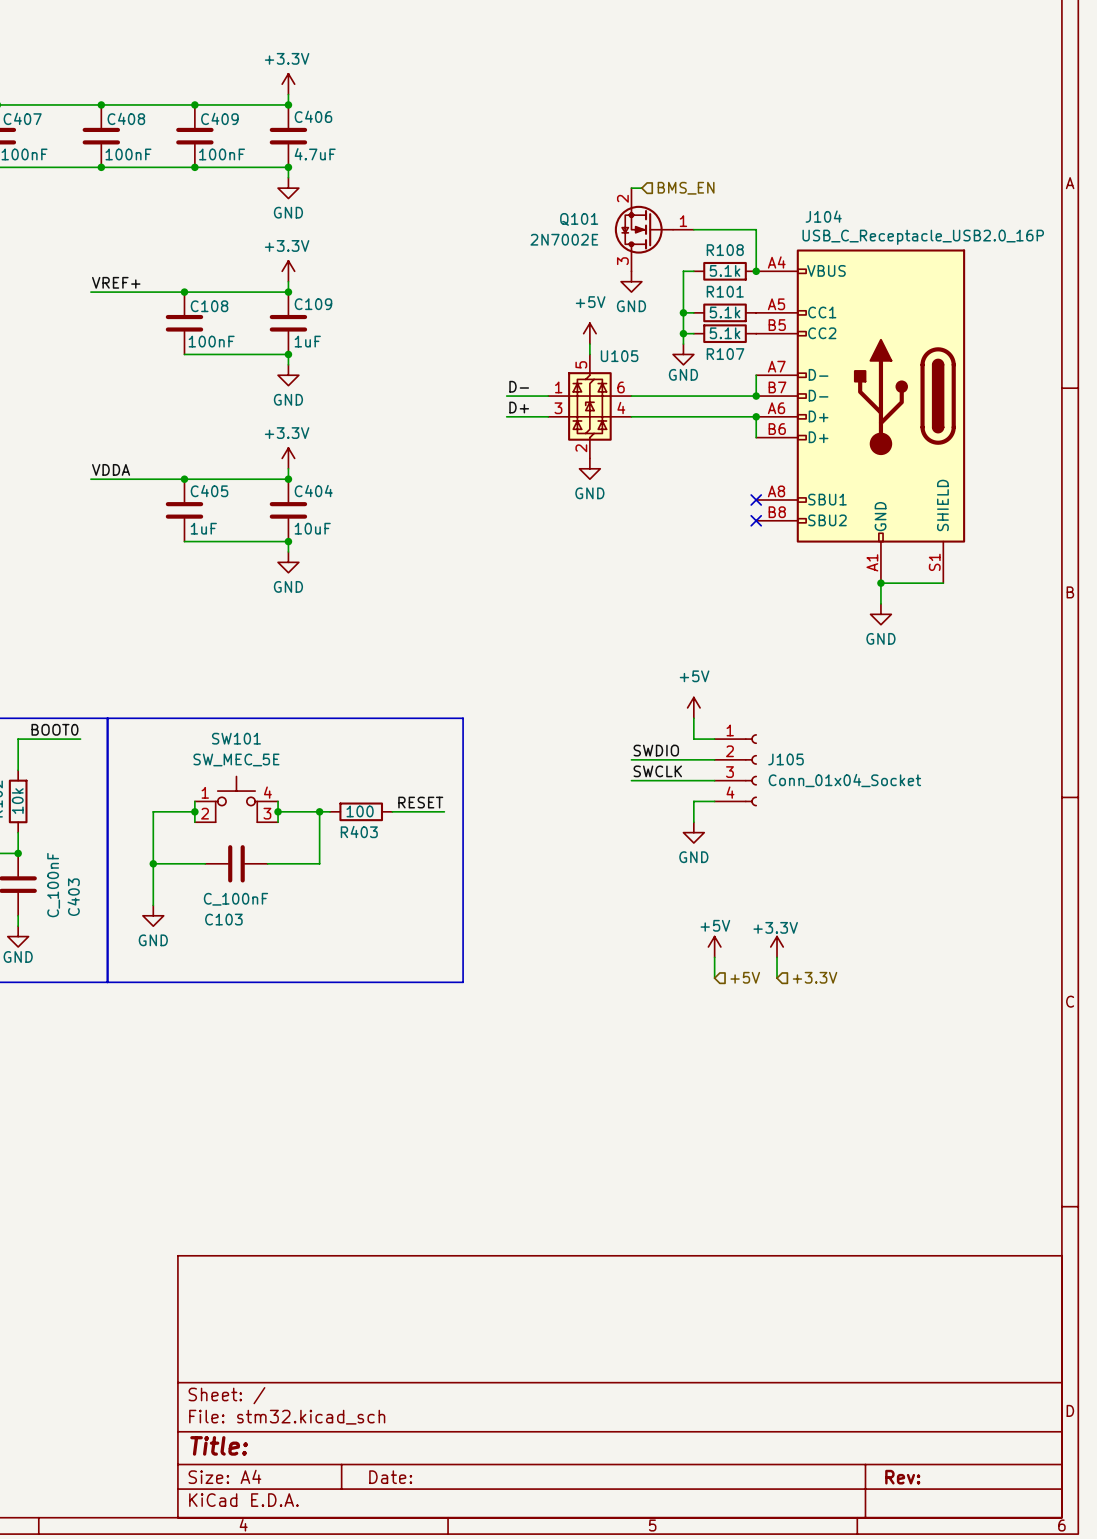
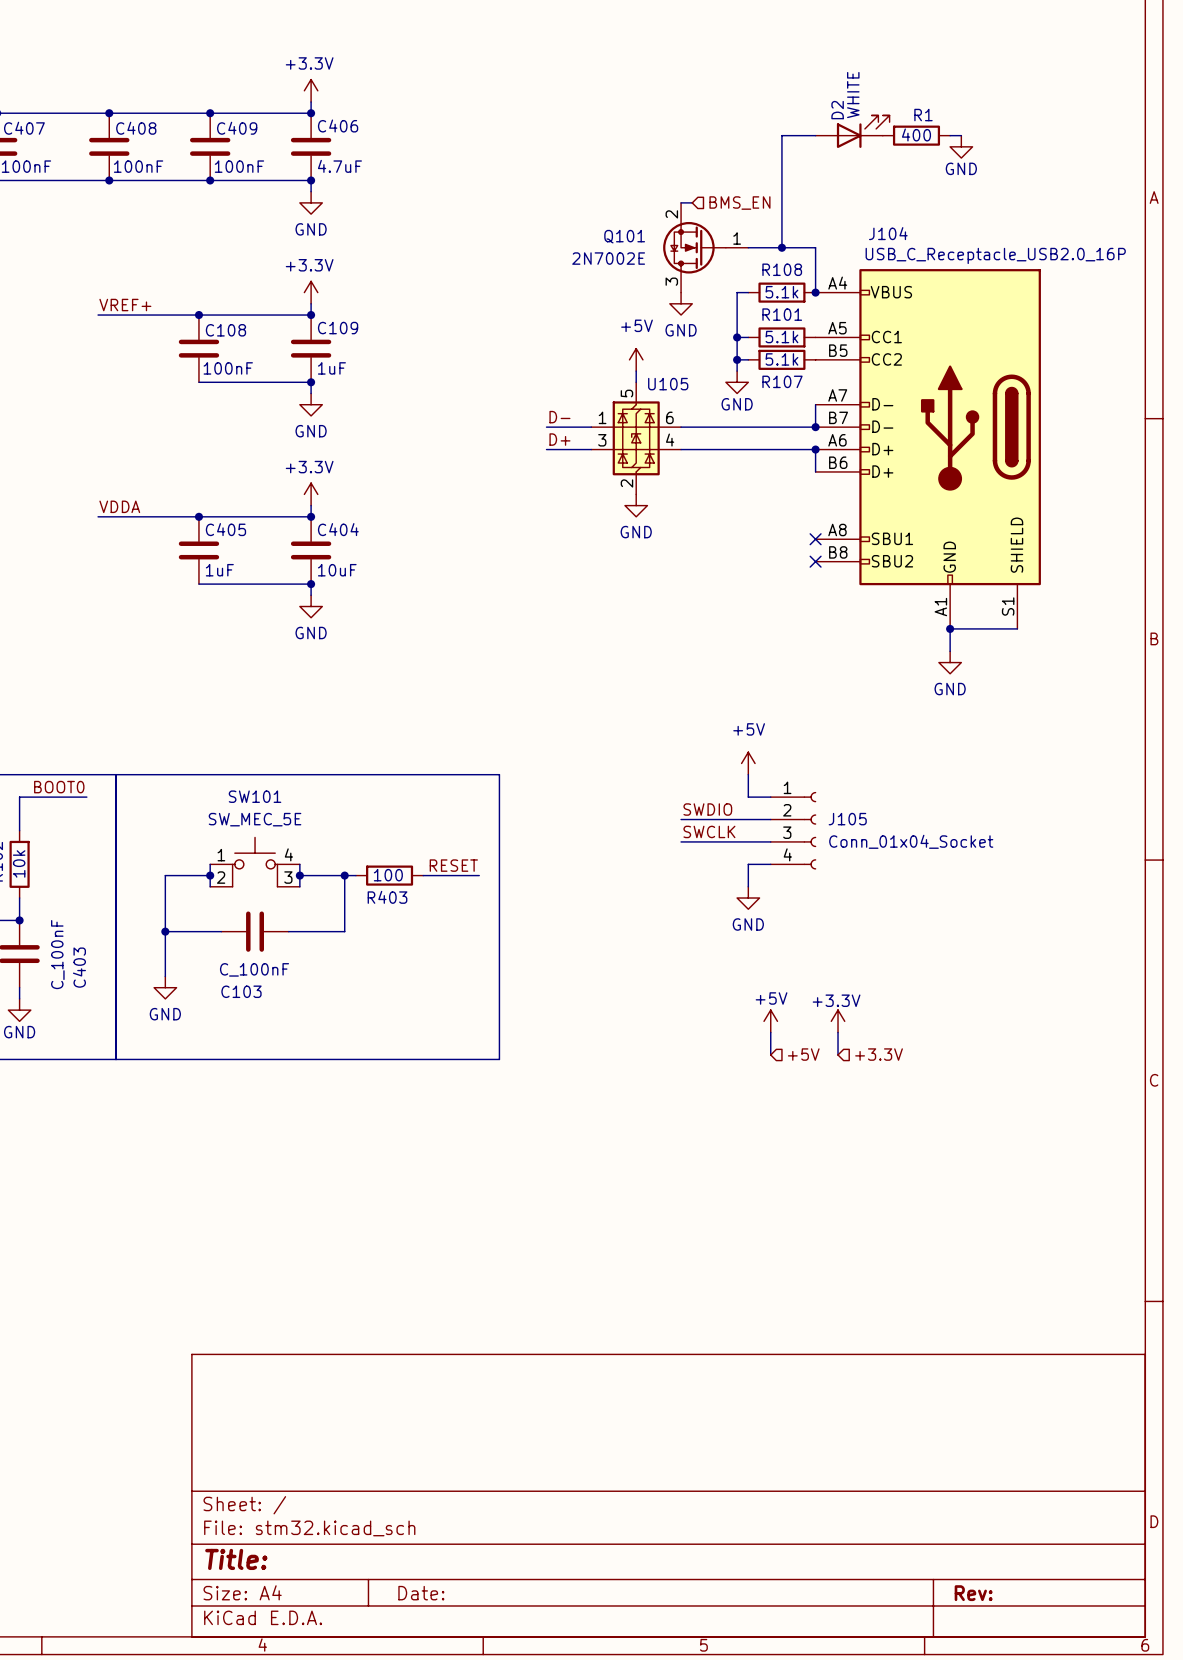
D2: none -> WHITE (852, 131)
wire: none -> (815, 135) (781, 135) (781, 247)
R1: none -> 400 (916, 135)
wire: none -> (950, 135) (961, 135)
power symbol: none -> GND (961, 146)
junction: none -> (781, 247)

